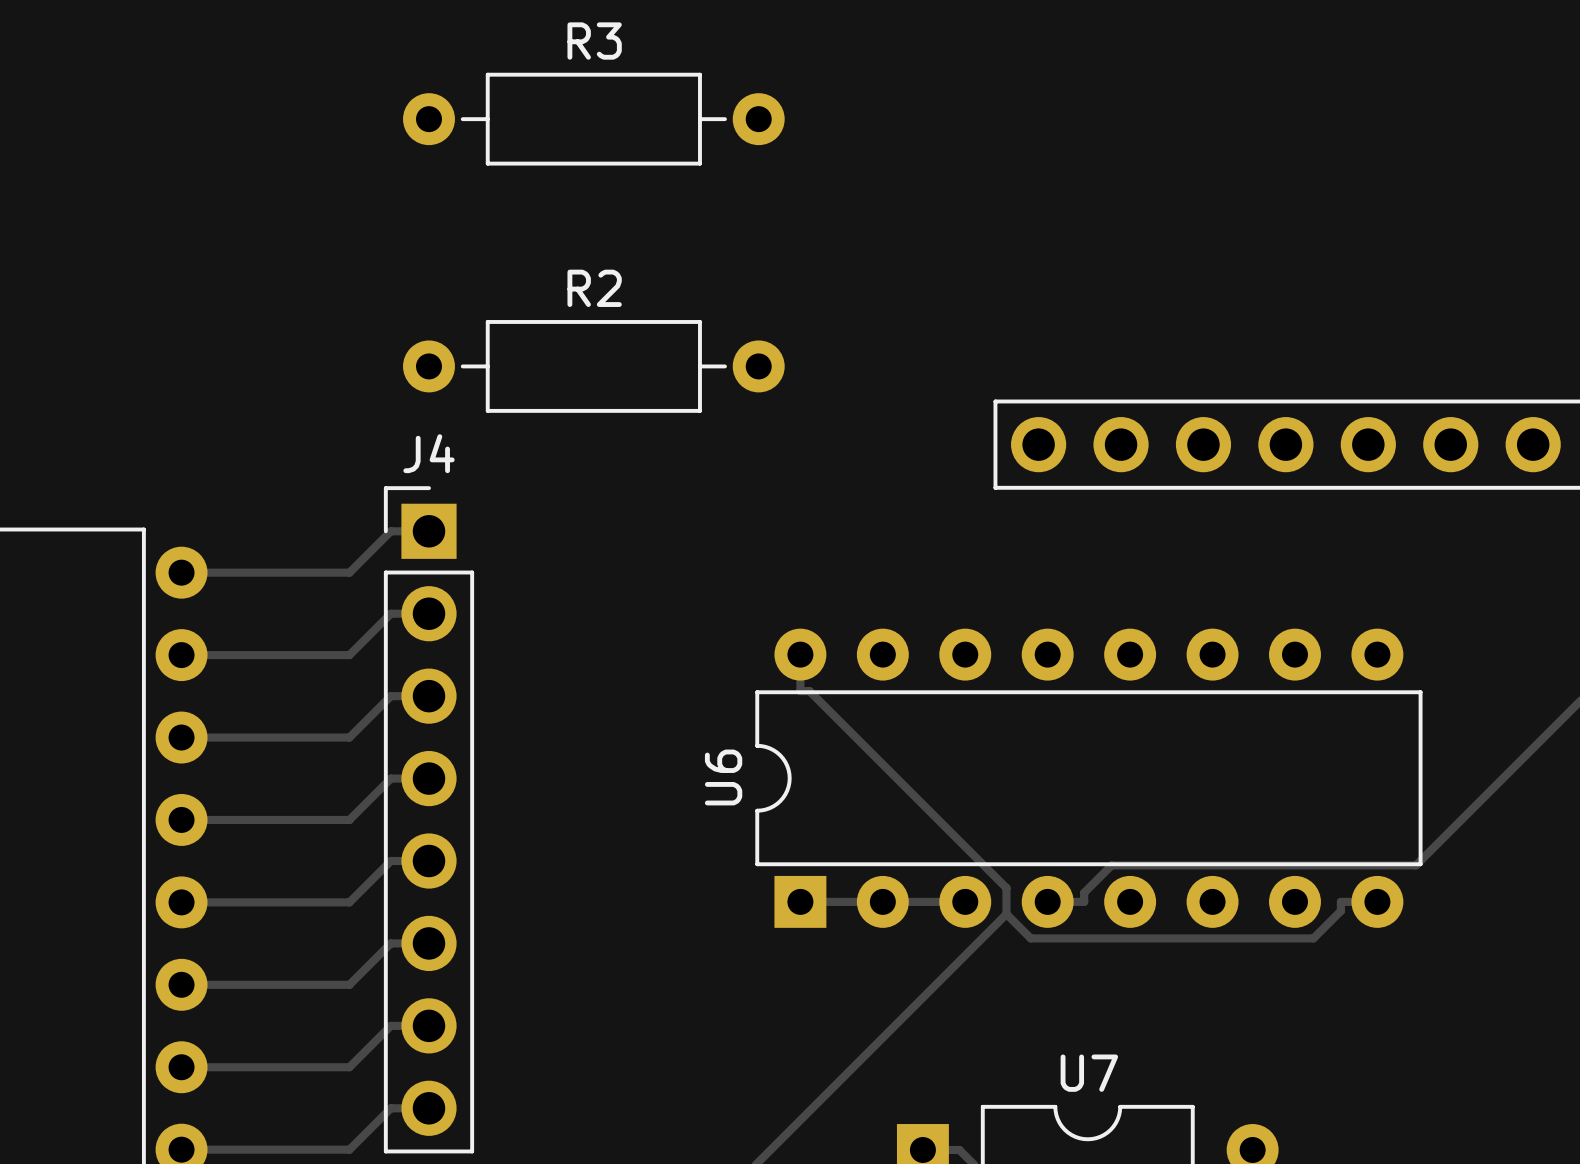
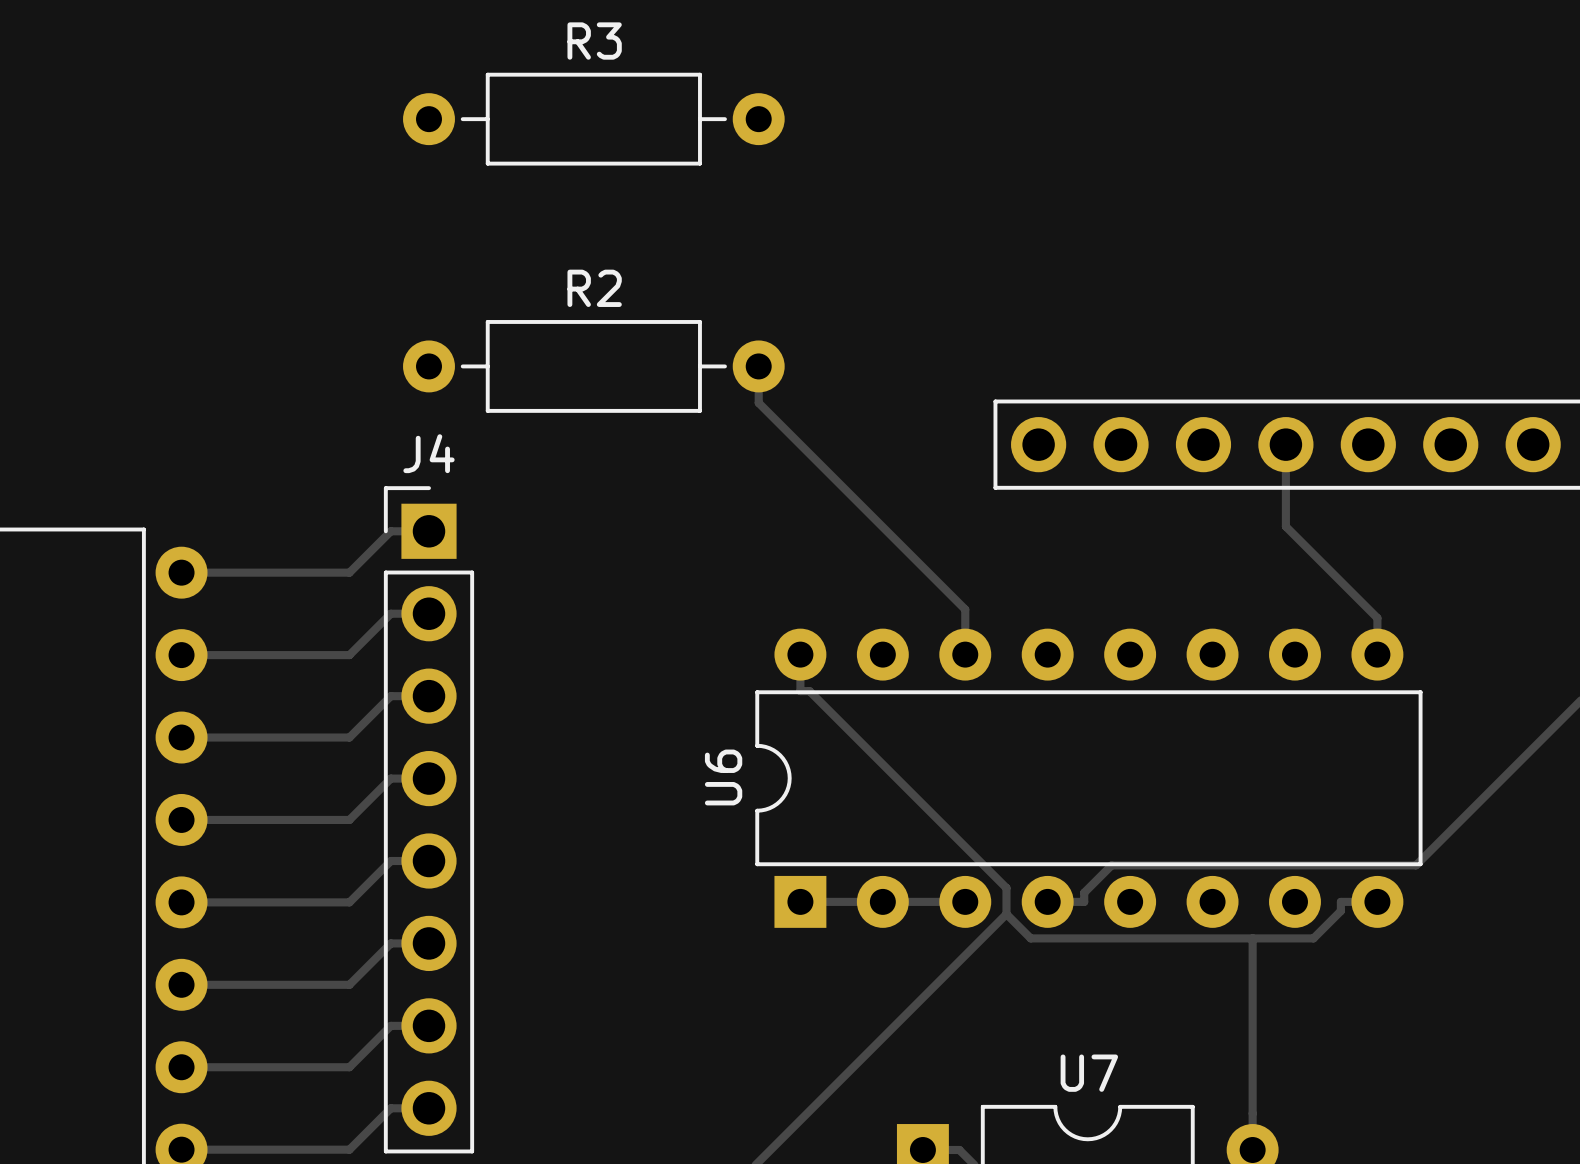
track: none -> (758, 366) (758, 402) (965, 609) (965, 654)
track: none -> (1285, 444) (1285, 526) (1377, 618) (1377, 654)
track: none -> (1252, 938) (1252, 1149)

